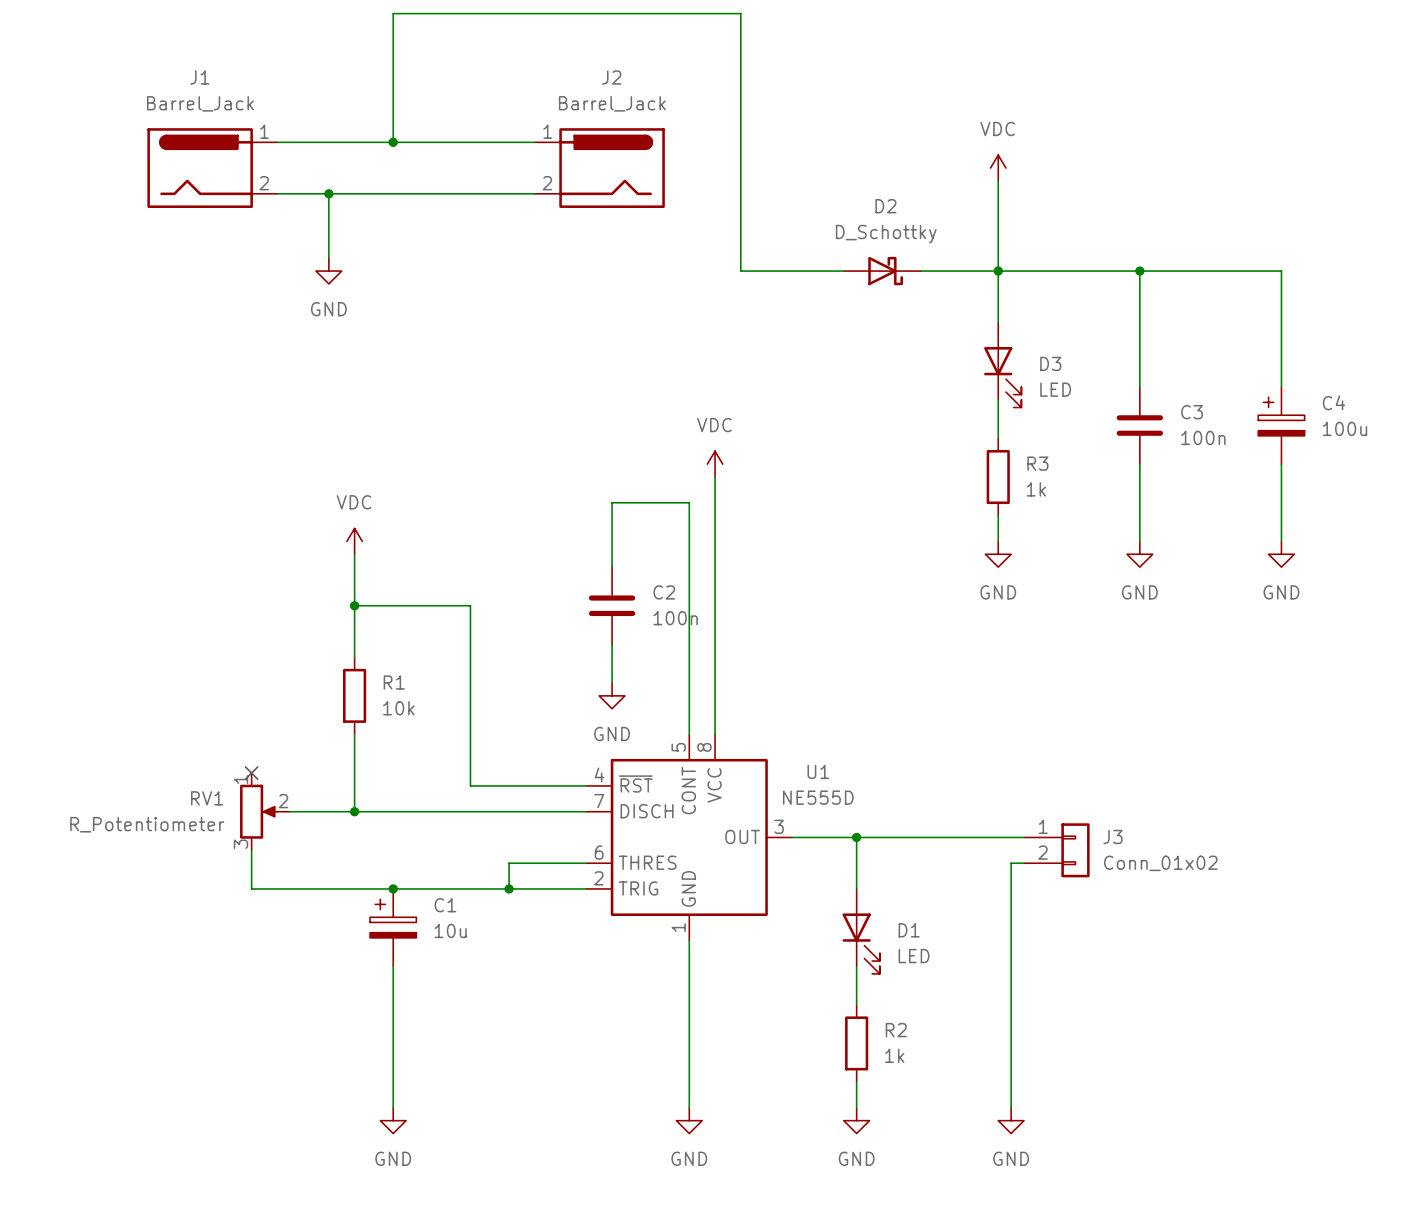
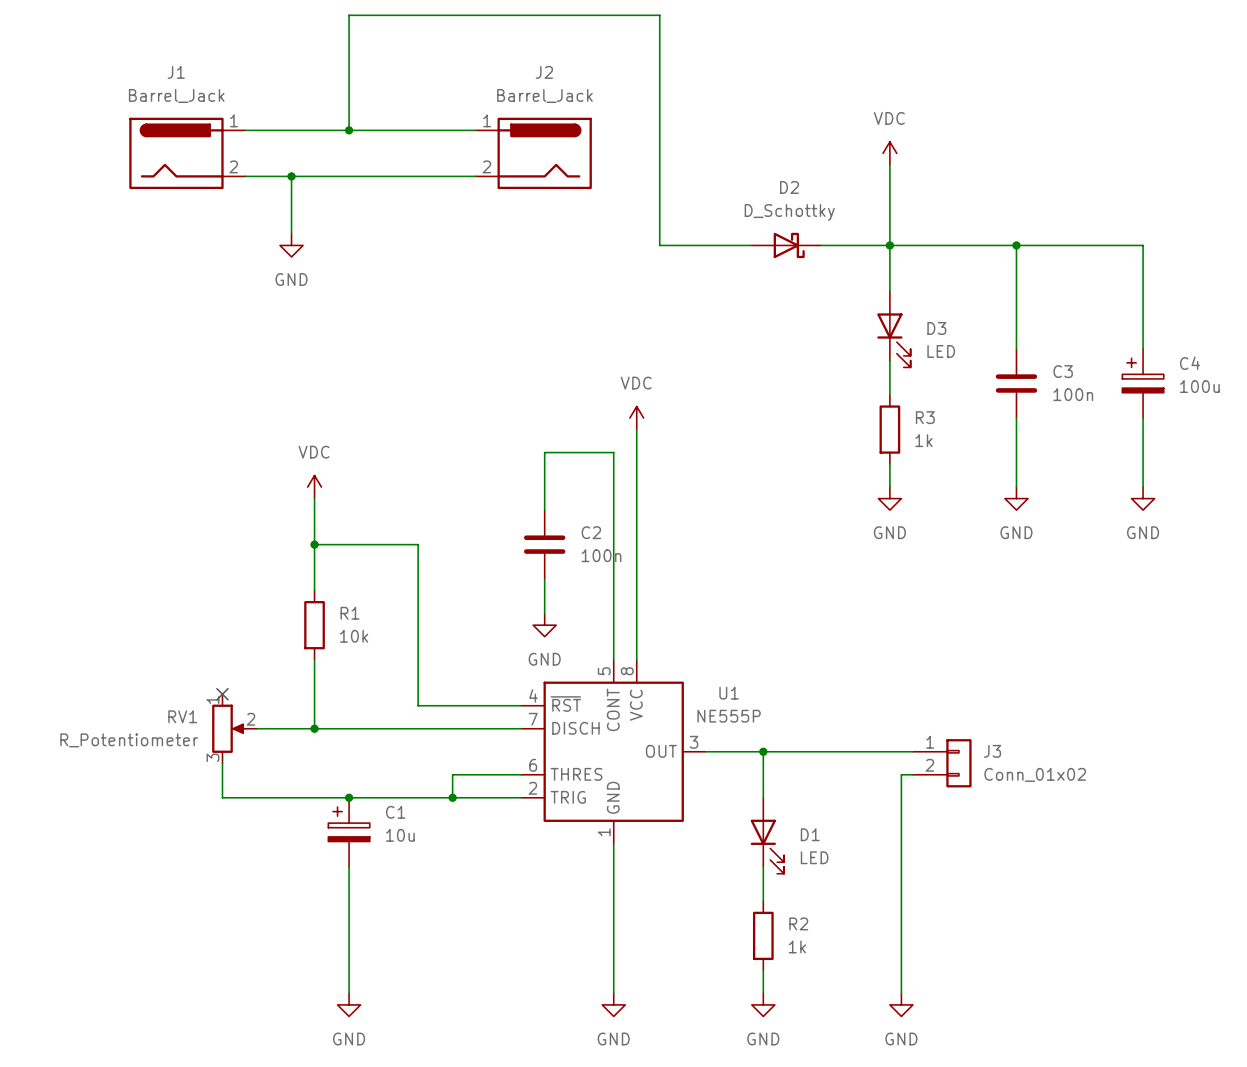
U1 value: NE555D (818, 797) -> NE555P (729, 716)

